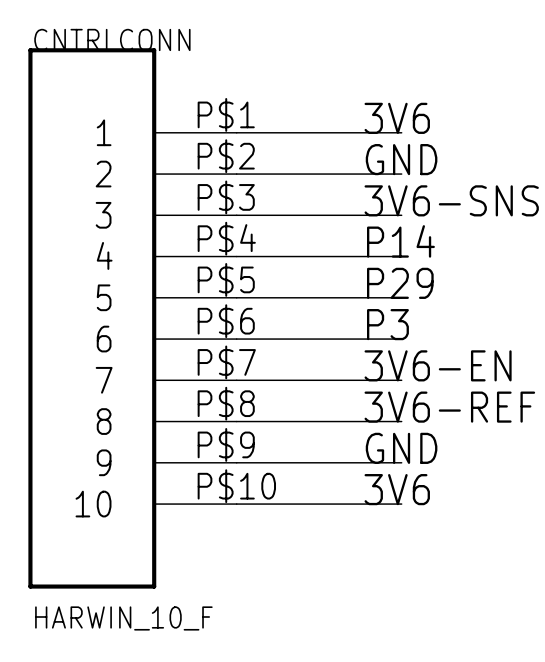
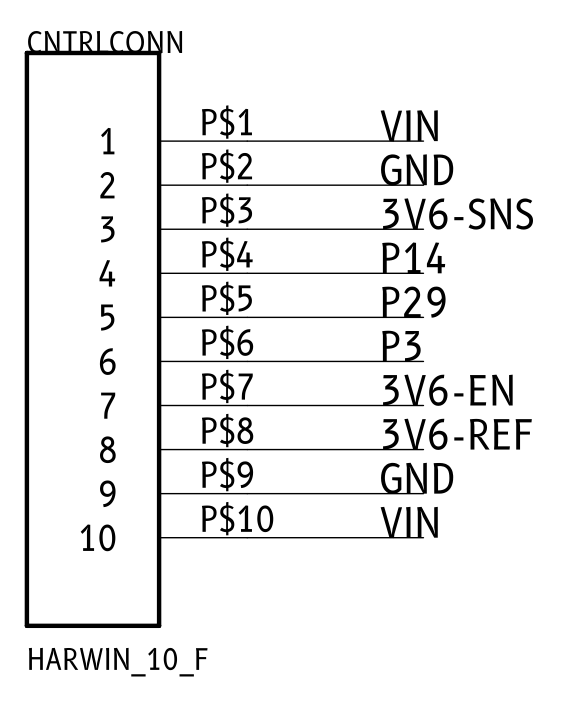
label: 3V6 (397, 118) -> VIN (409, 125)
label: 3V6 (397, 489) -> VIN (409, 522)

